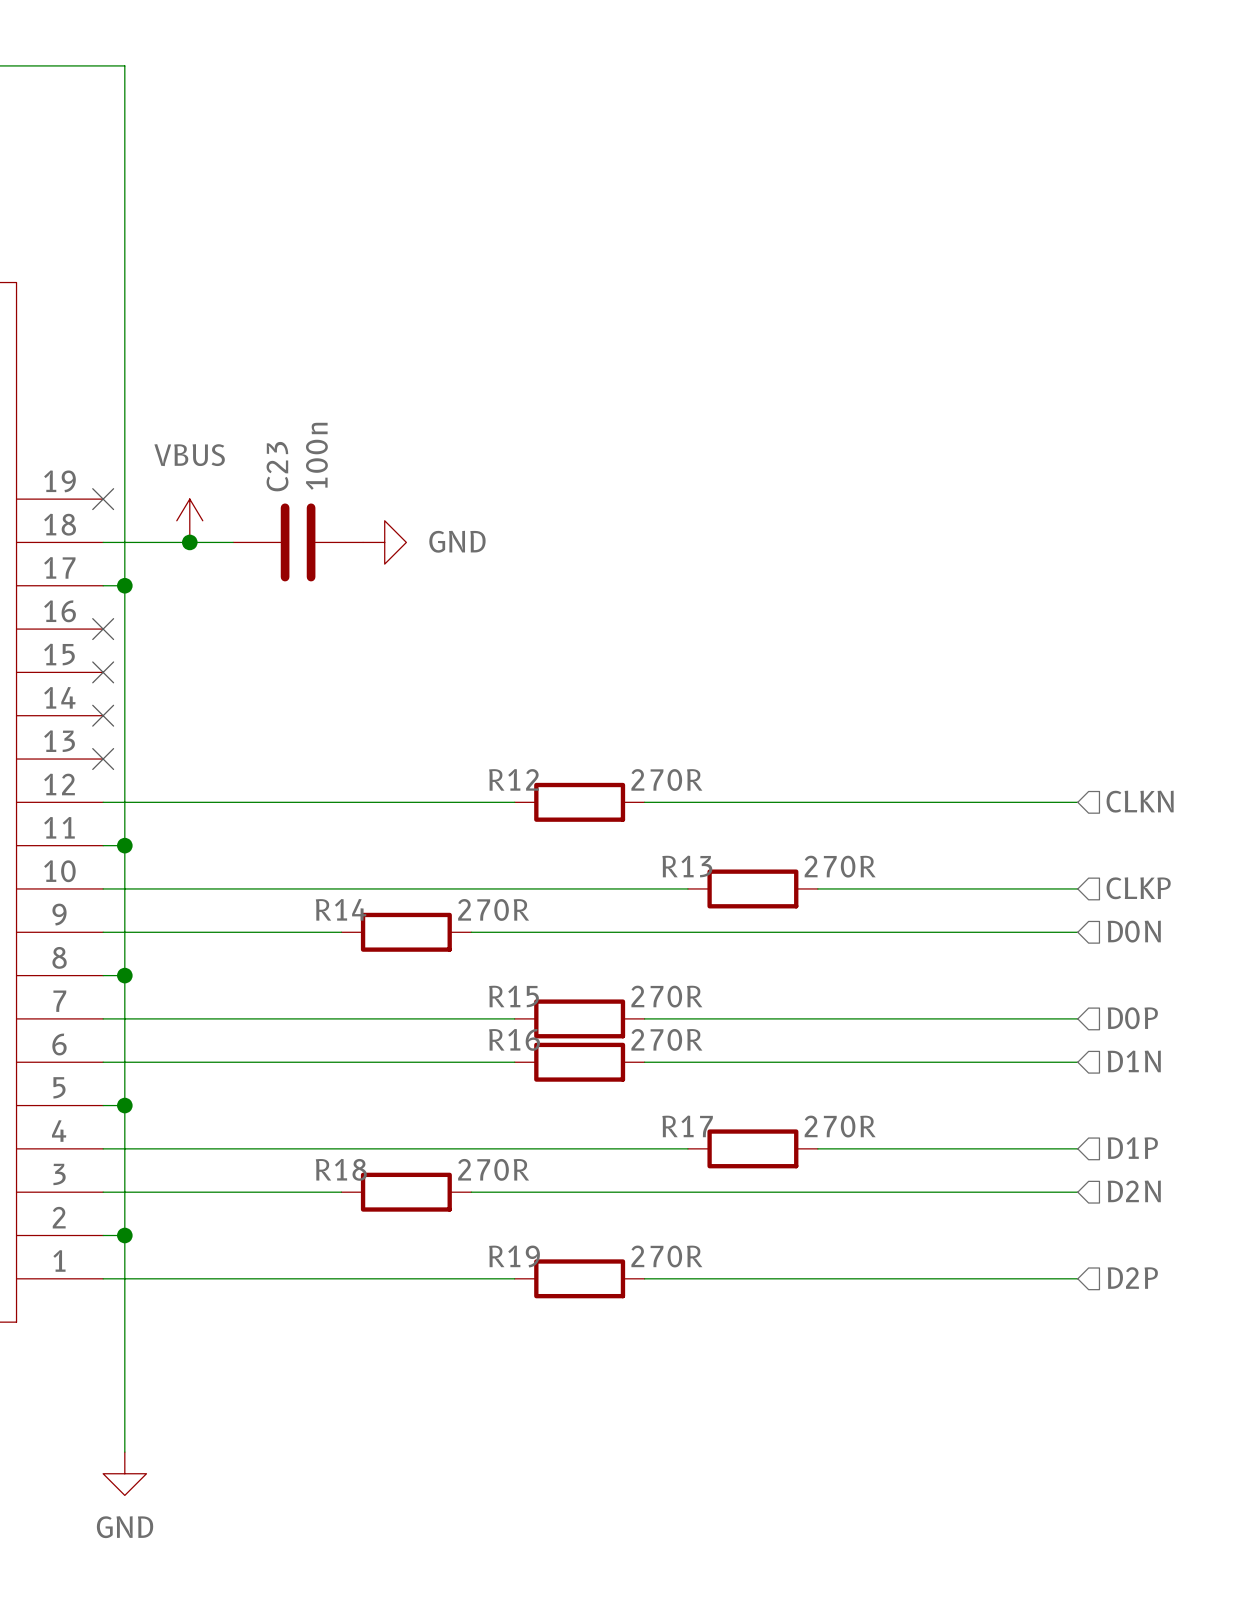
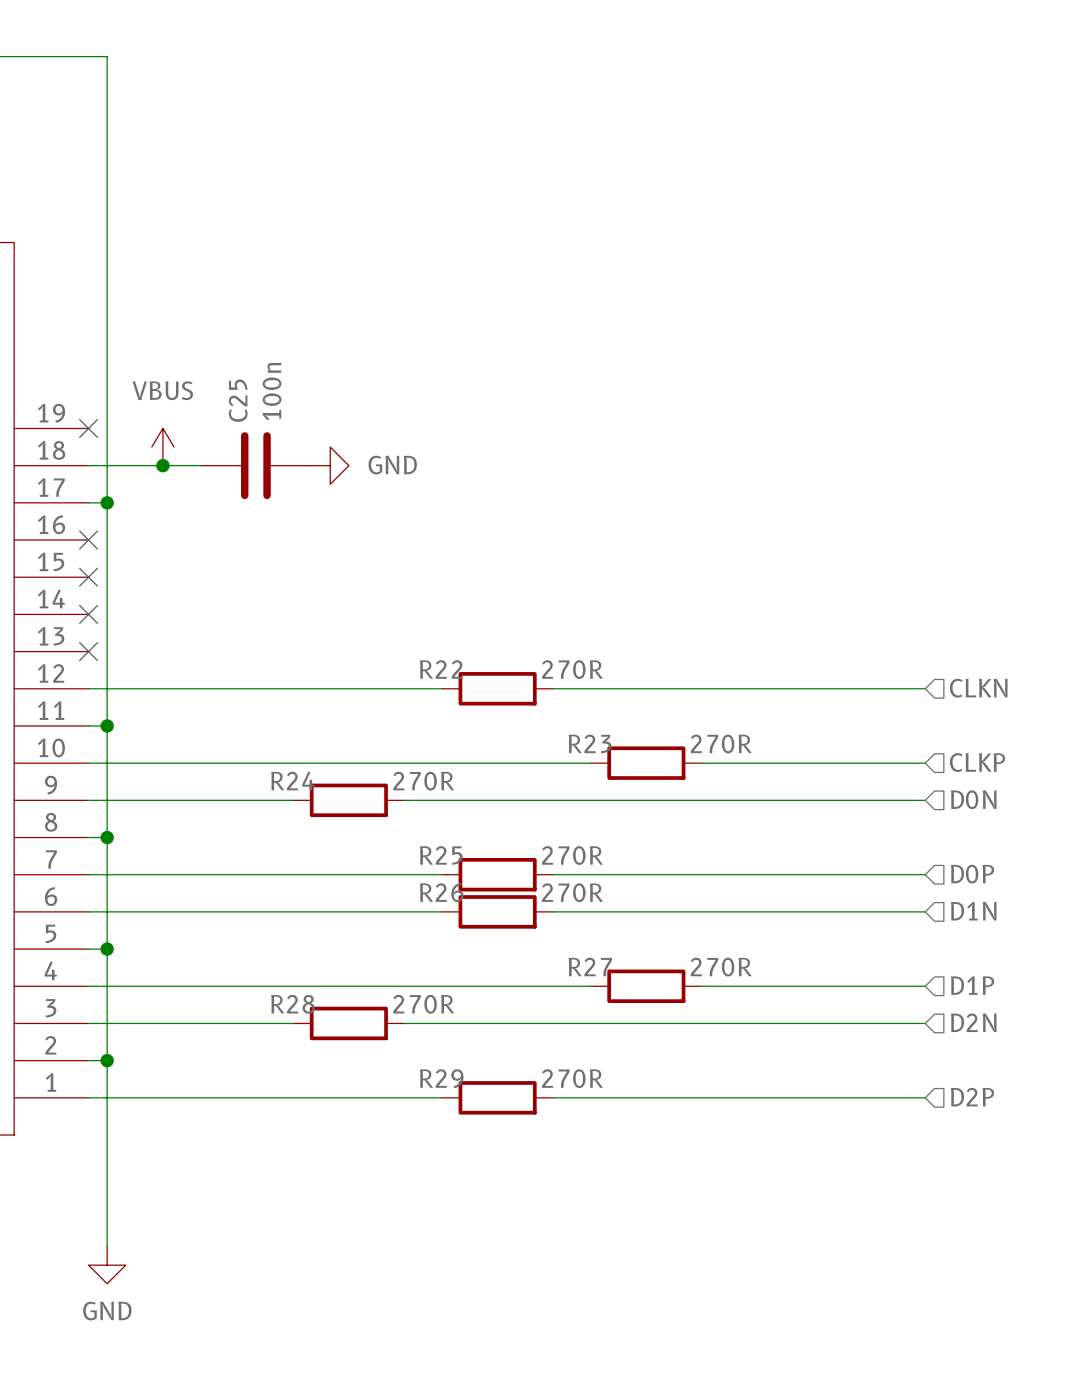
C23 name: C23 (277, 466) -> C25 (238, 400)
R12 name: R12 (514, 779) -> R22 (441, 669)
R13 name: R13 (687, 866) -> R23 (590, 743)
R14 name: R14 (341, 909) -> R24 (292, 781)
R15 name: R15 (513, 996) -> R25 (441, 855)
R16 name: R16 (514, 1039) -> R26 (441, 892)
R17 name: R17 (687, 1126) -> R27 (590, 967)
R18 name: R18 (341, 1169) -> R28 (293, 1004)
R19 name: R19 (514, 1256) -> R29 (441, 1078)

